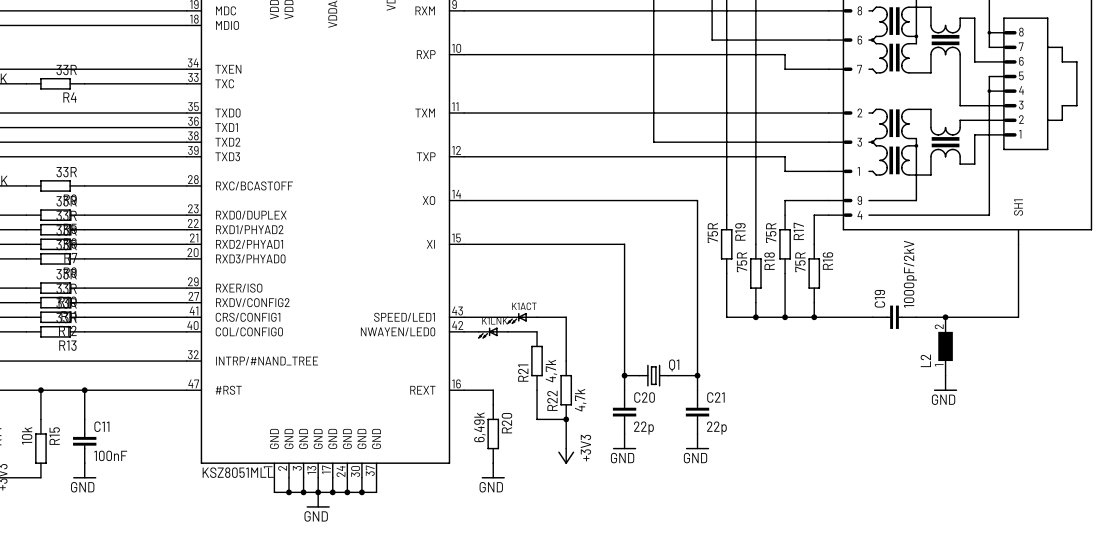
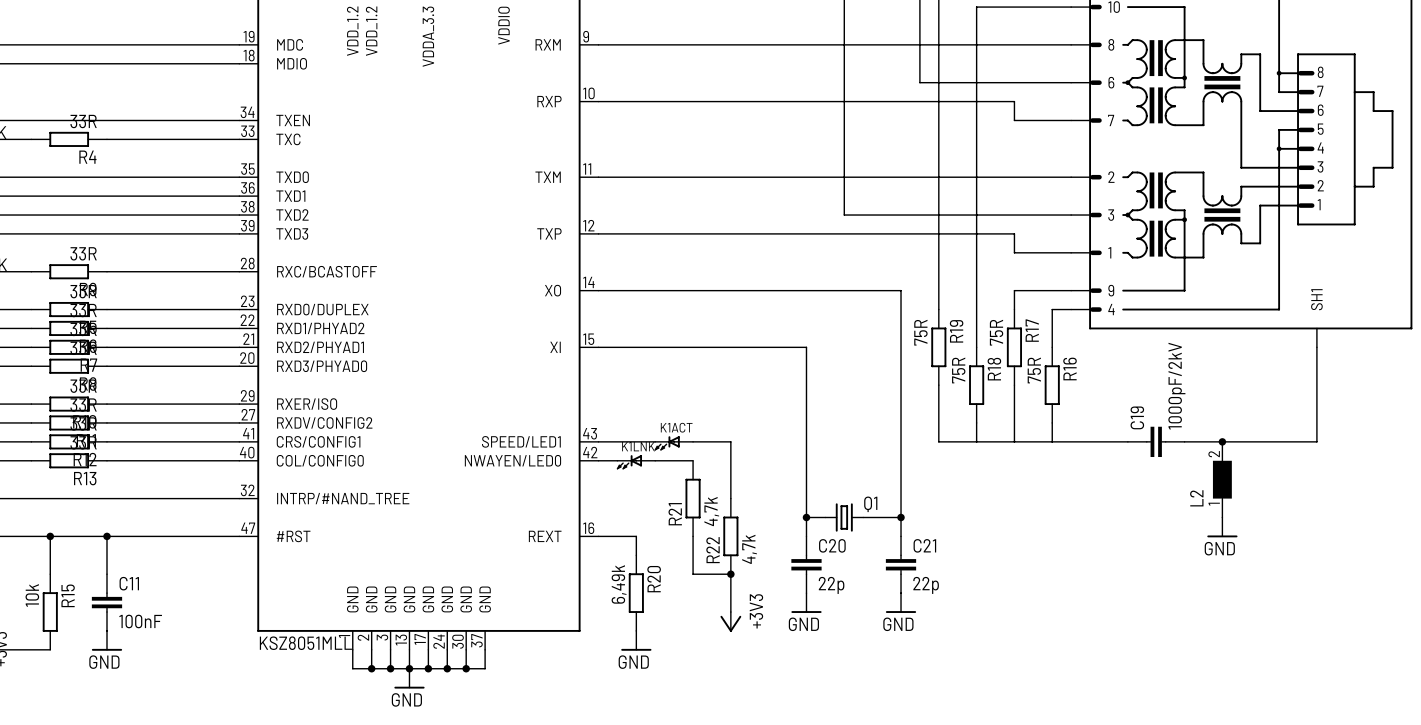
junction: (755, 317) -> none
junction: (785, 317) -> none
junction: (814, 317) -> none

